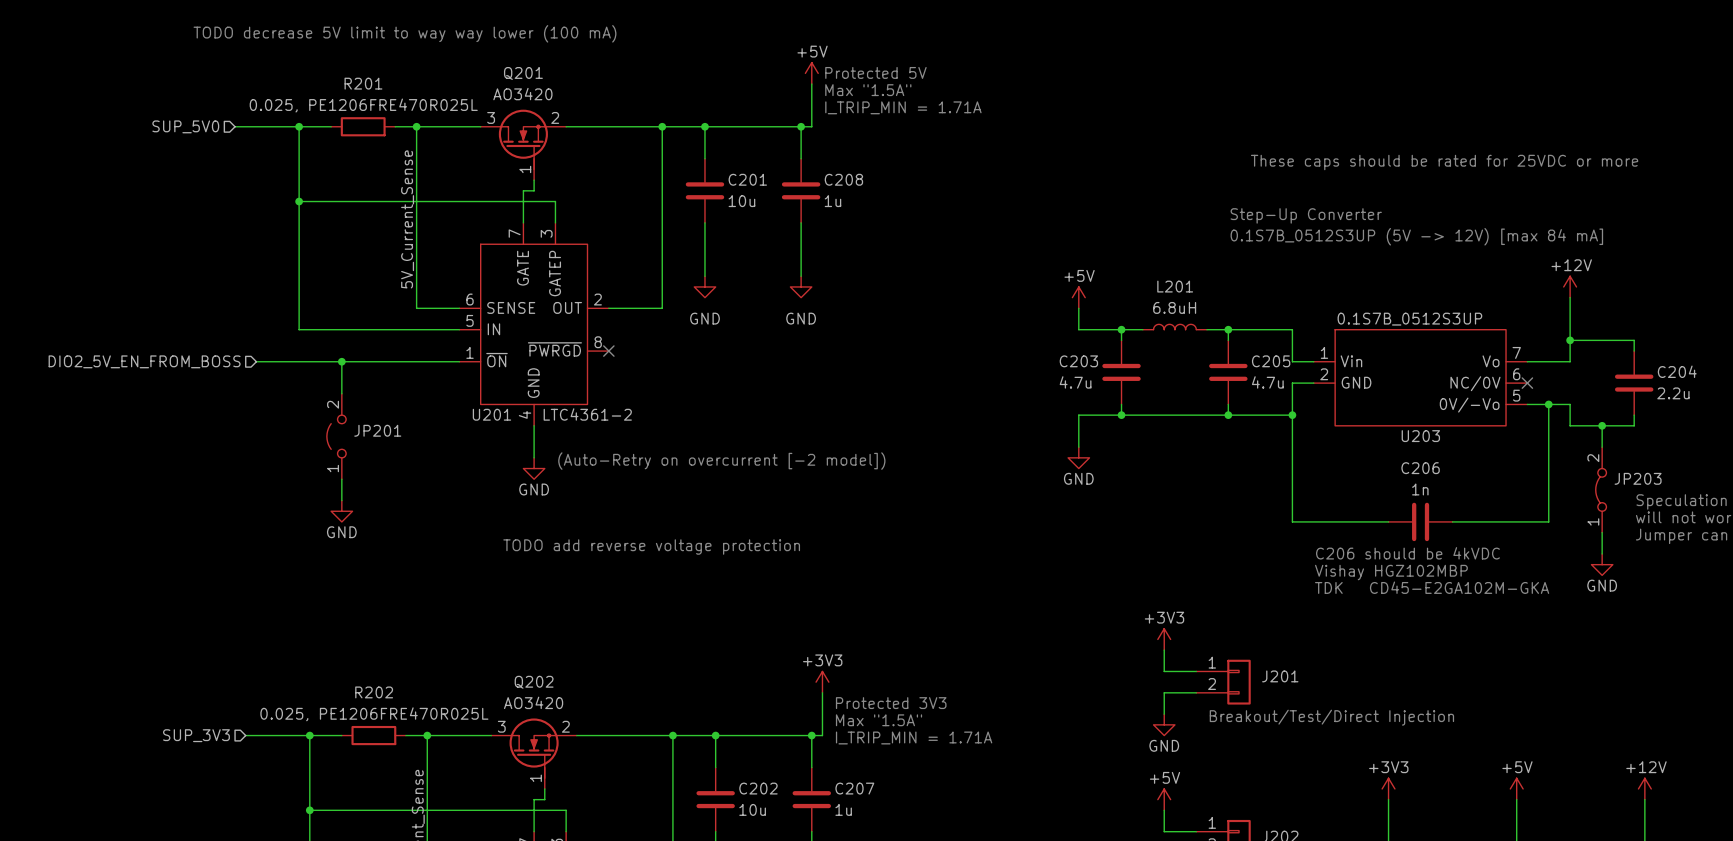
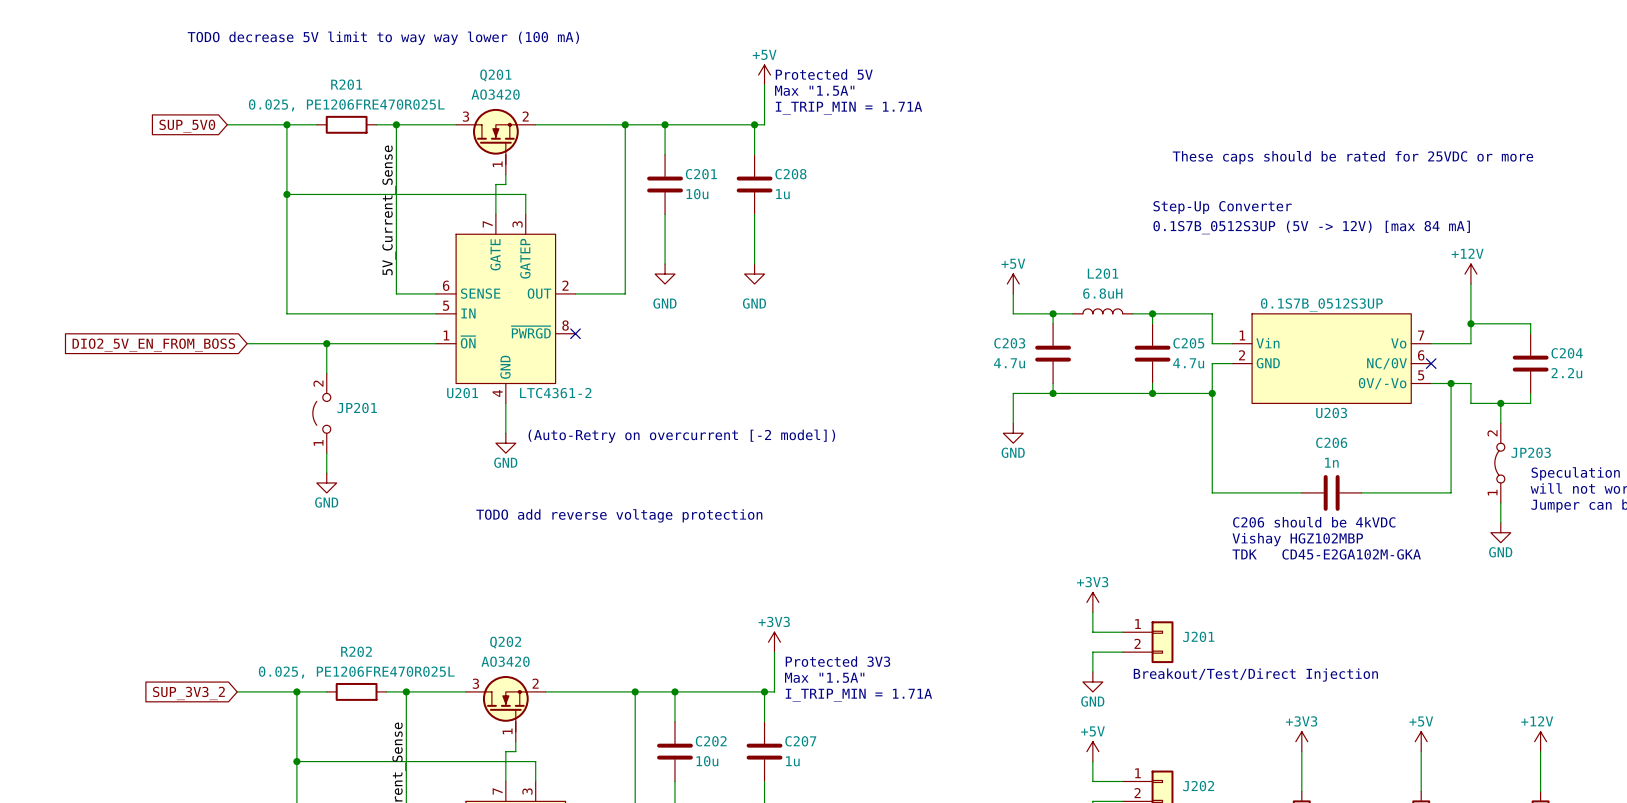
hierarchical label: SUP_5V0 (185, 126) -> none
global label: none -> SUP_5V0 (187, 126)
hierarchical label: DIO2_5V_EN_FROM_BOSS (144, 361) -> none
global label: none -> DIO2_5V_EN_FROM_BOSS (153, 345)
hierarchical label: SUP_3V3 (196, 735) -> none
global label: none -> SUP_3V3_2 (188, 693)

